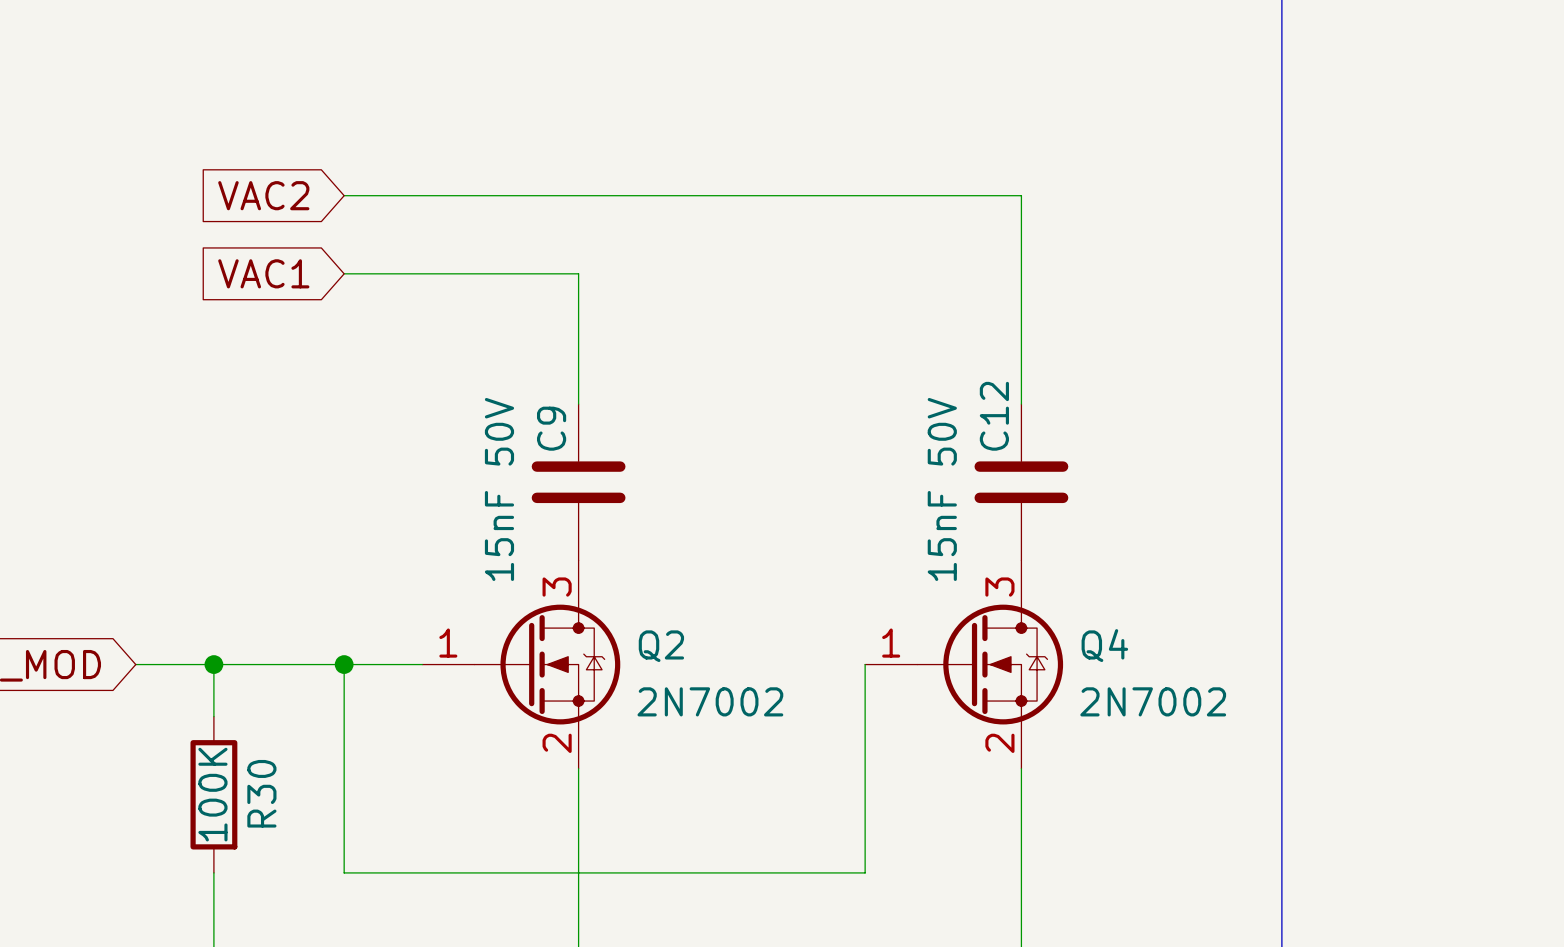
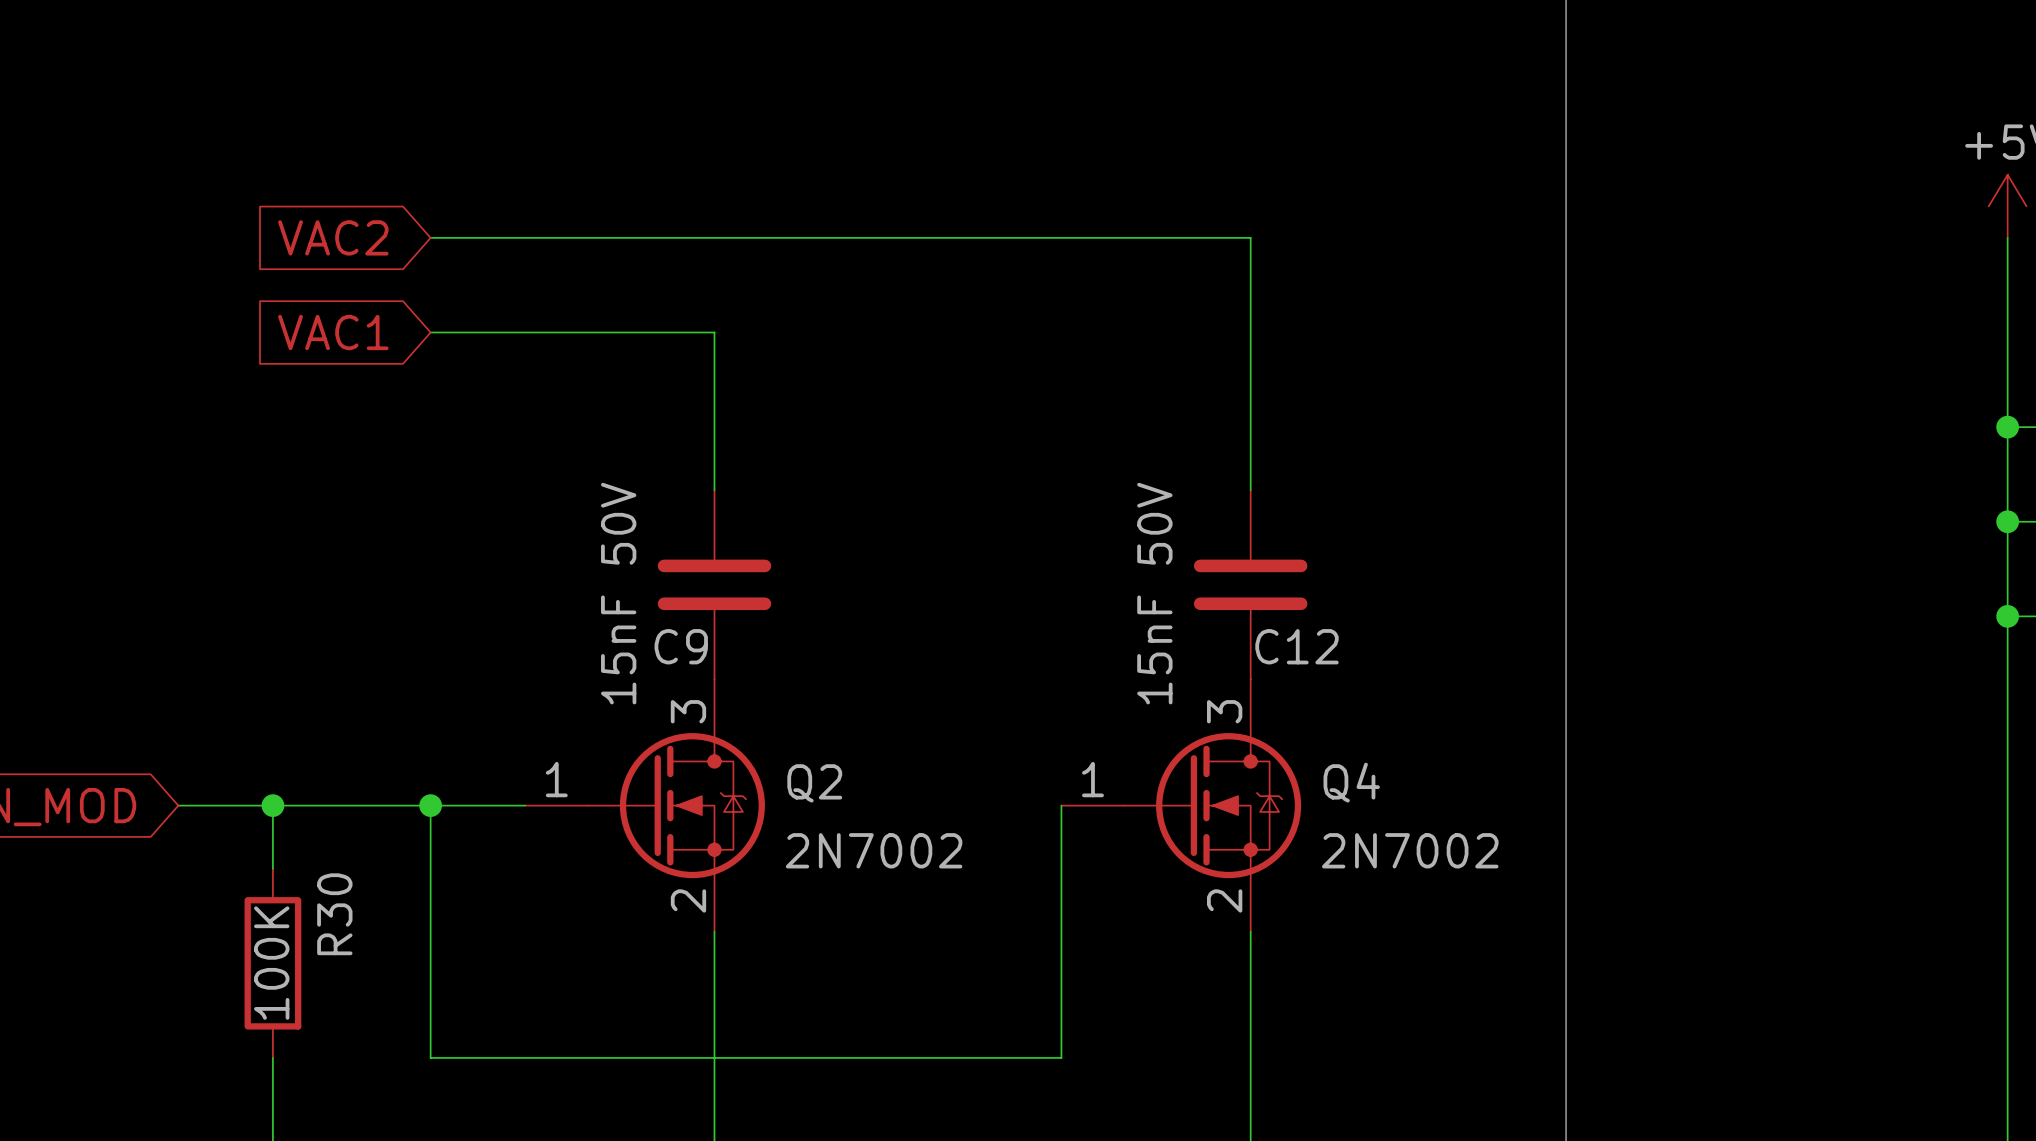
C12 name rotation: 0° (994, 416) -> 90° clockwise (1296, 646)
C12 name position: C12 (994, 416) -> C12 (1296, 646)
C9 name rotation: 0° (551, 428) -> 90° clockwise (681, 646)
C9 name position: C9 (551, 428) -> C9 (681, 646)
R30 name position: R30 (261, 793) -> R30 (334, 914)

